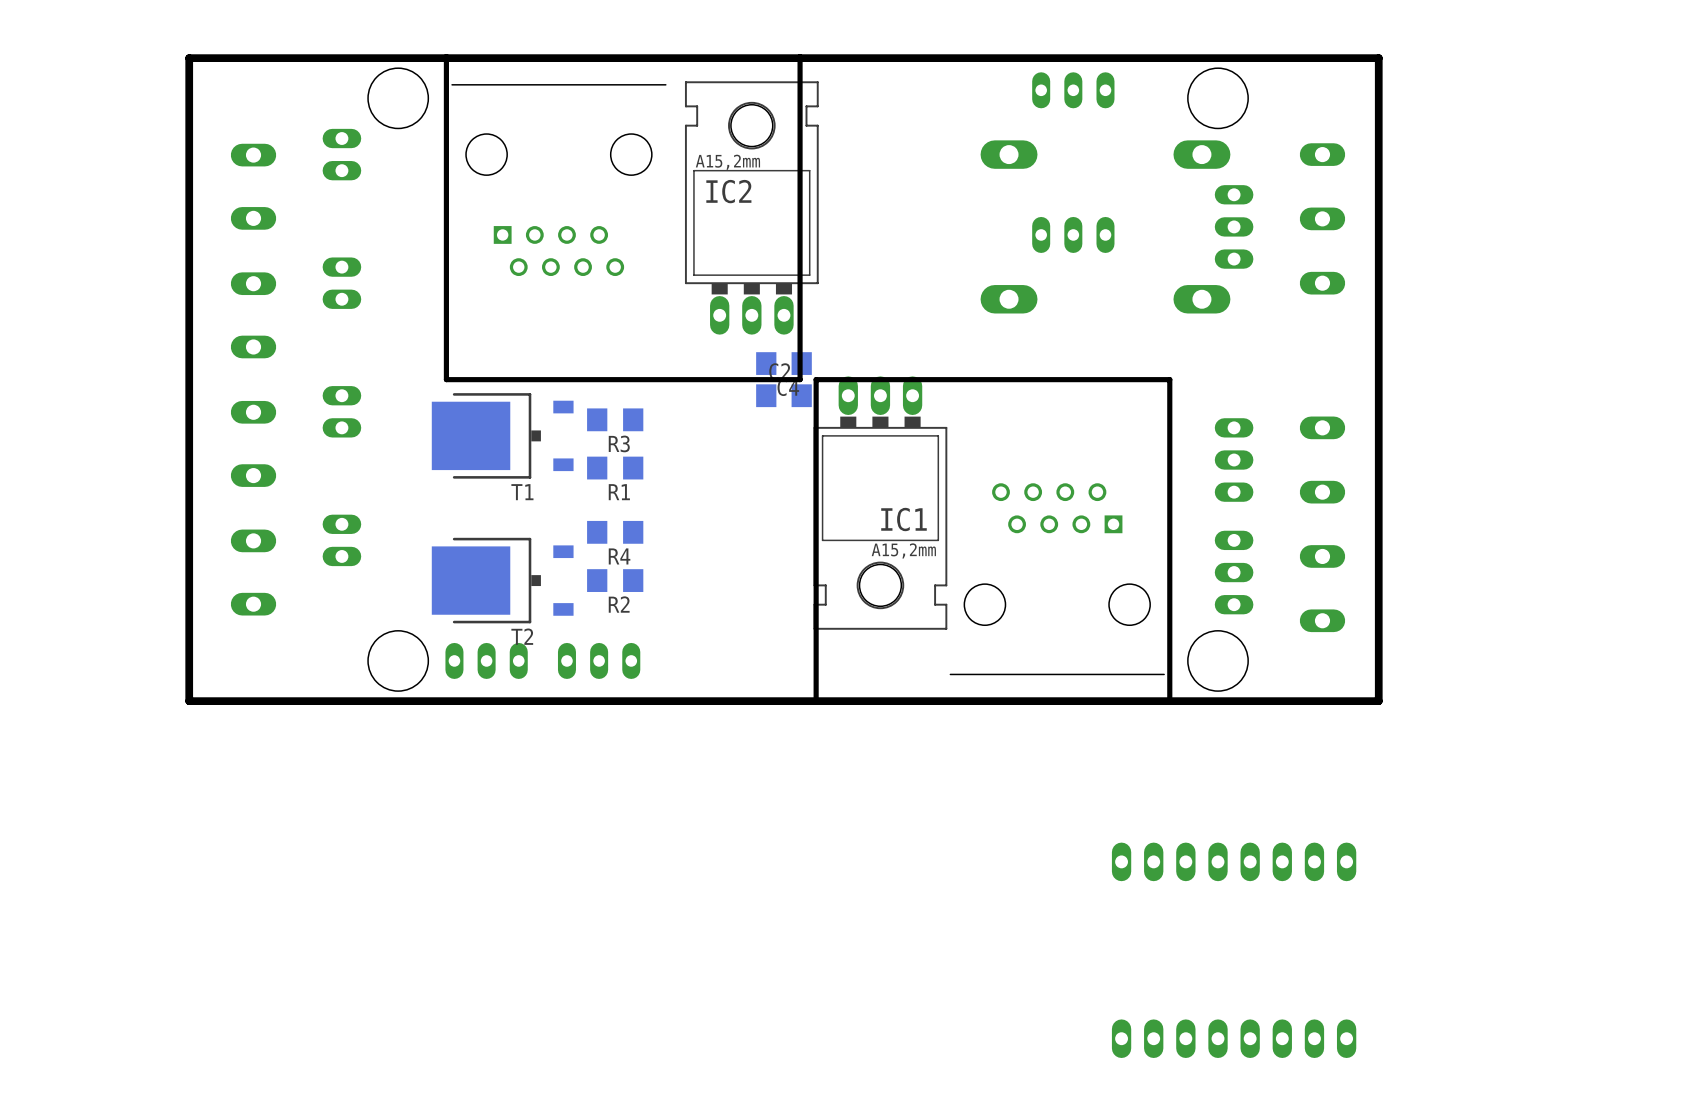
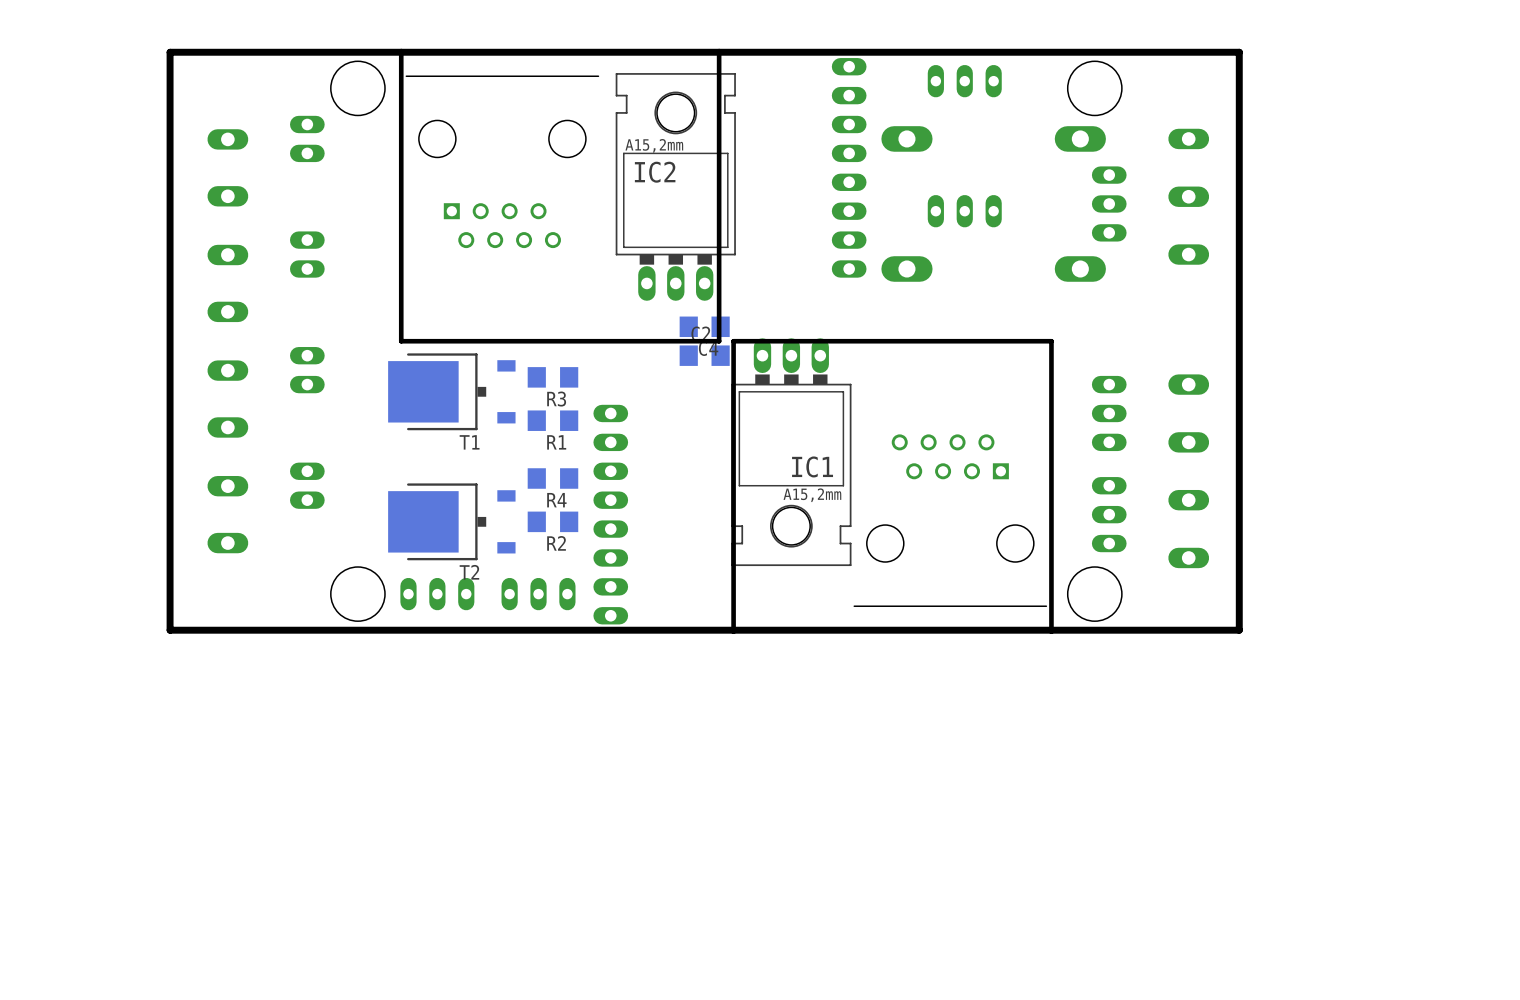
part: none -> (849, 167)
part: none -> (610, 514)
part: (1234, 861) -> none
part: (1234, 1038) -> none

